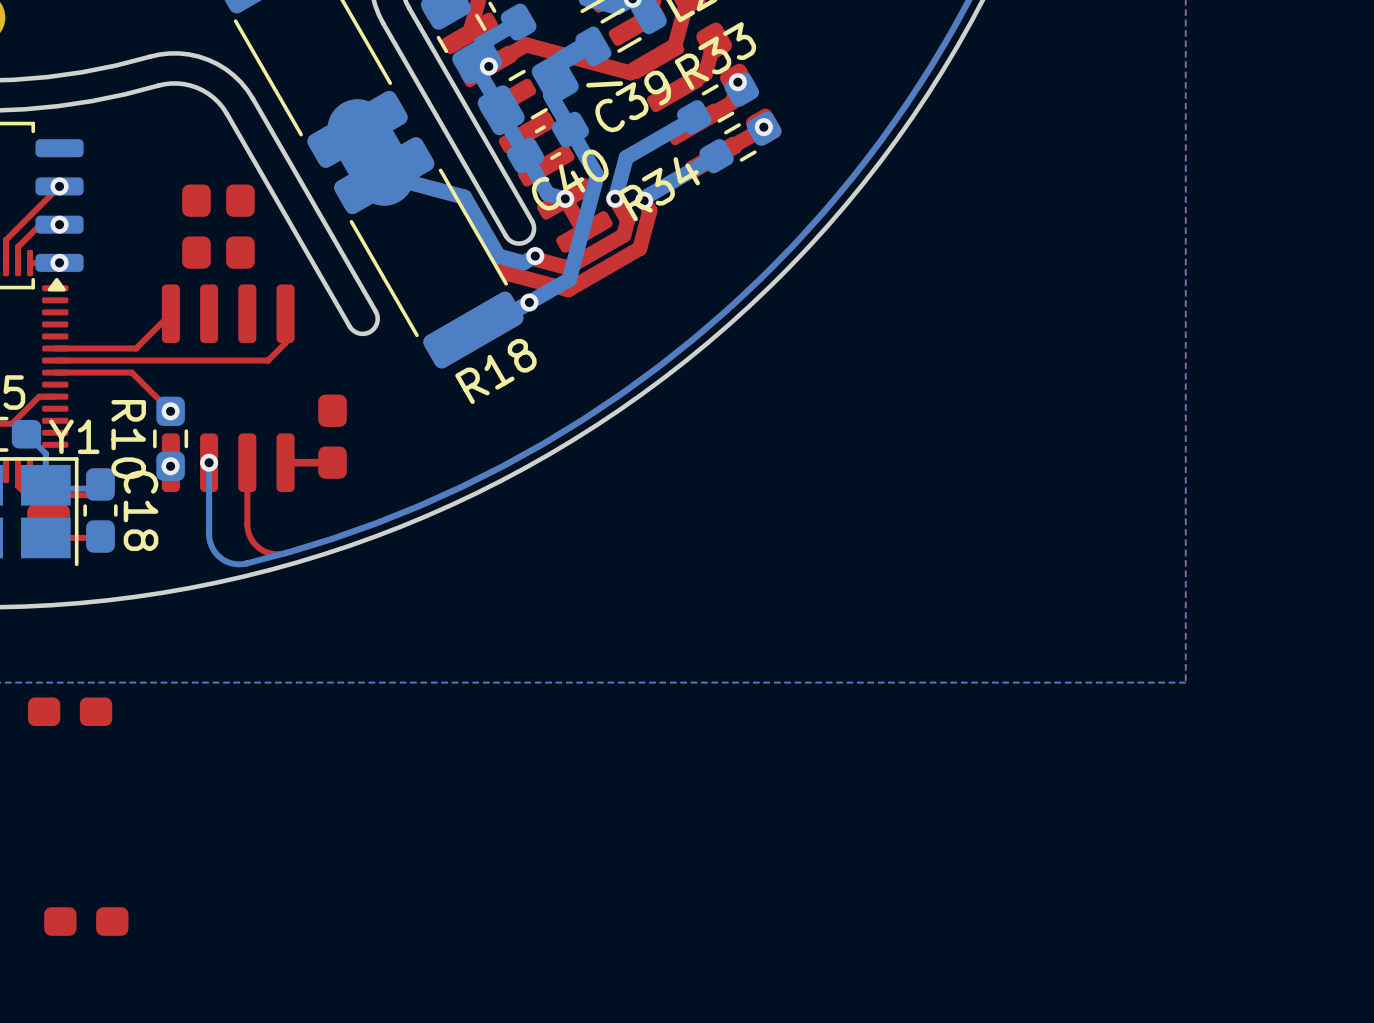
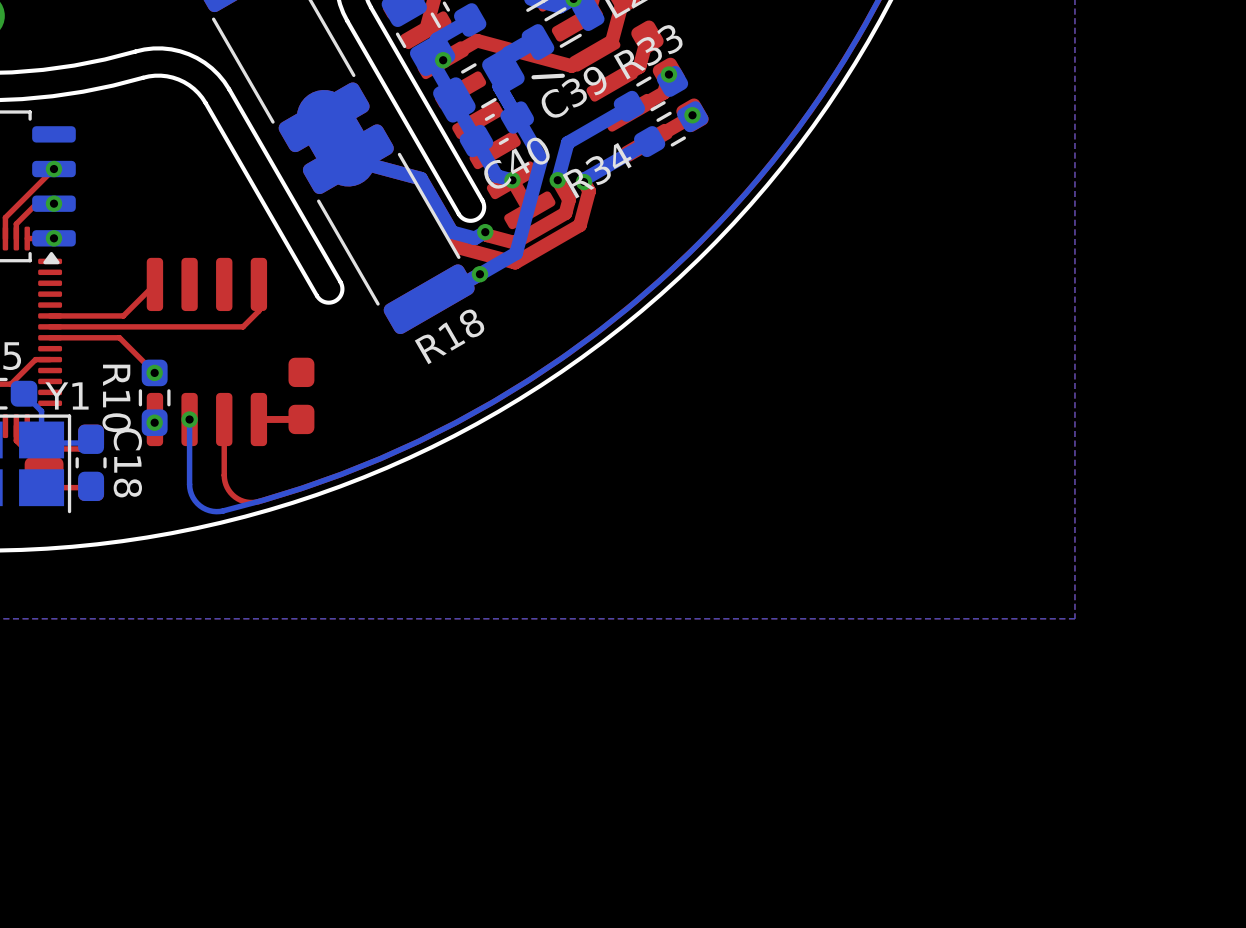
part: (196, 226) -> none
part: (240, 226) -> none
part: (70, 711) -> none
part: (86, 921) -> none

